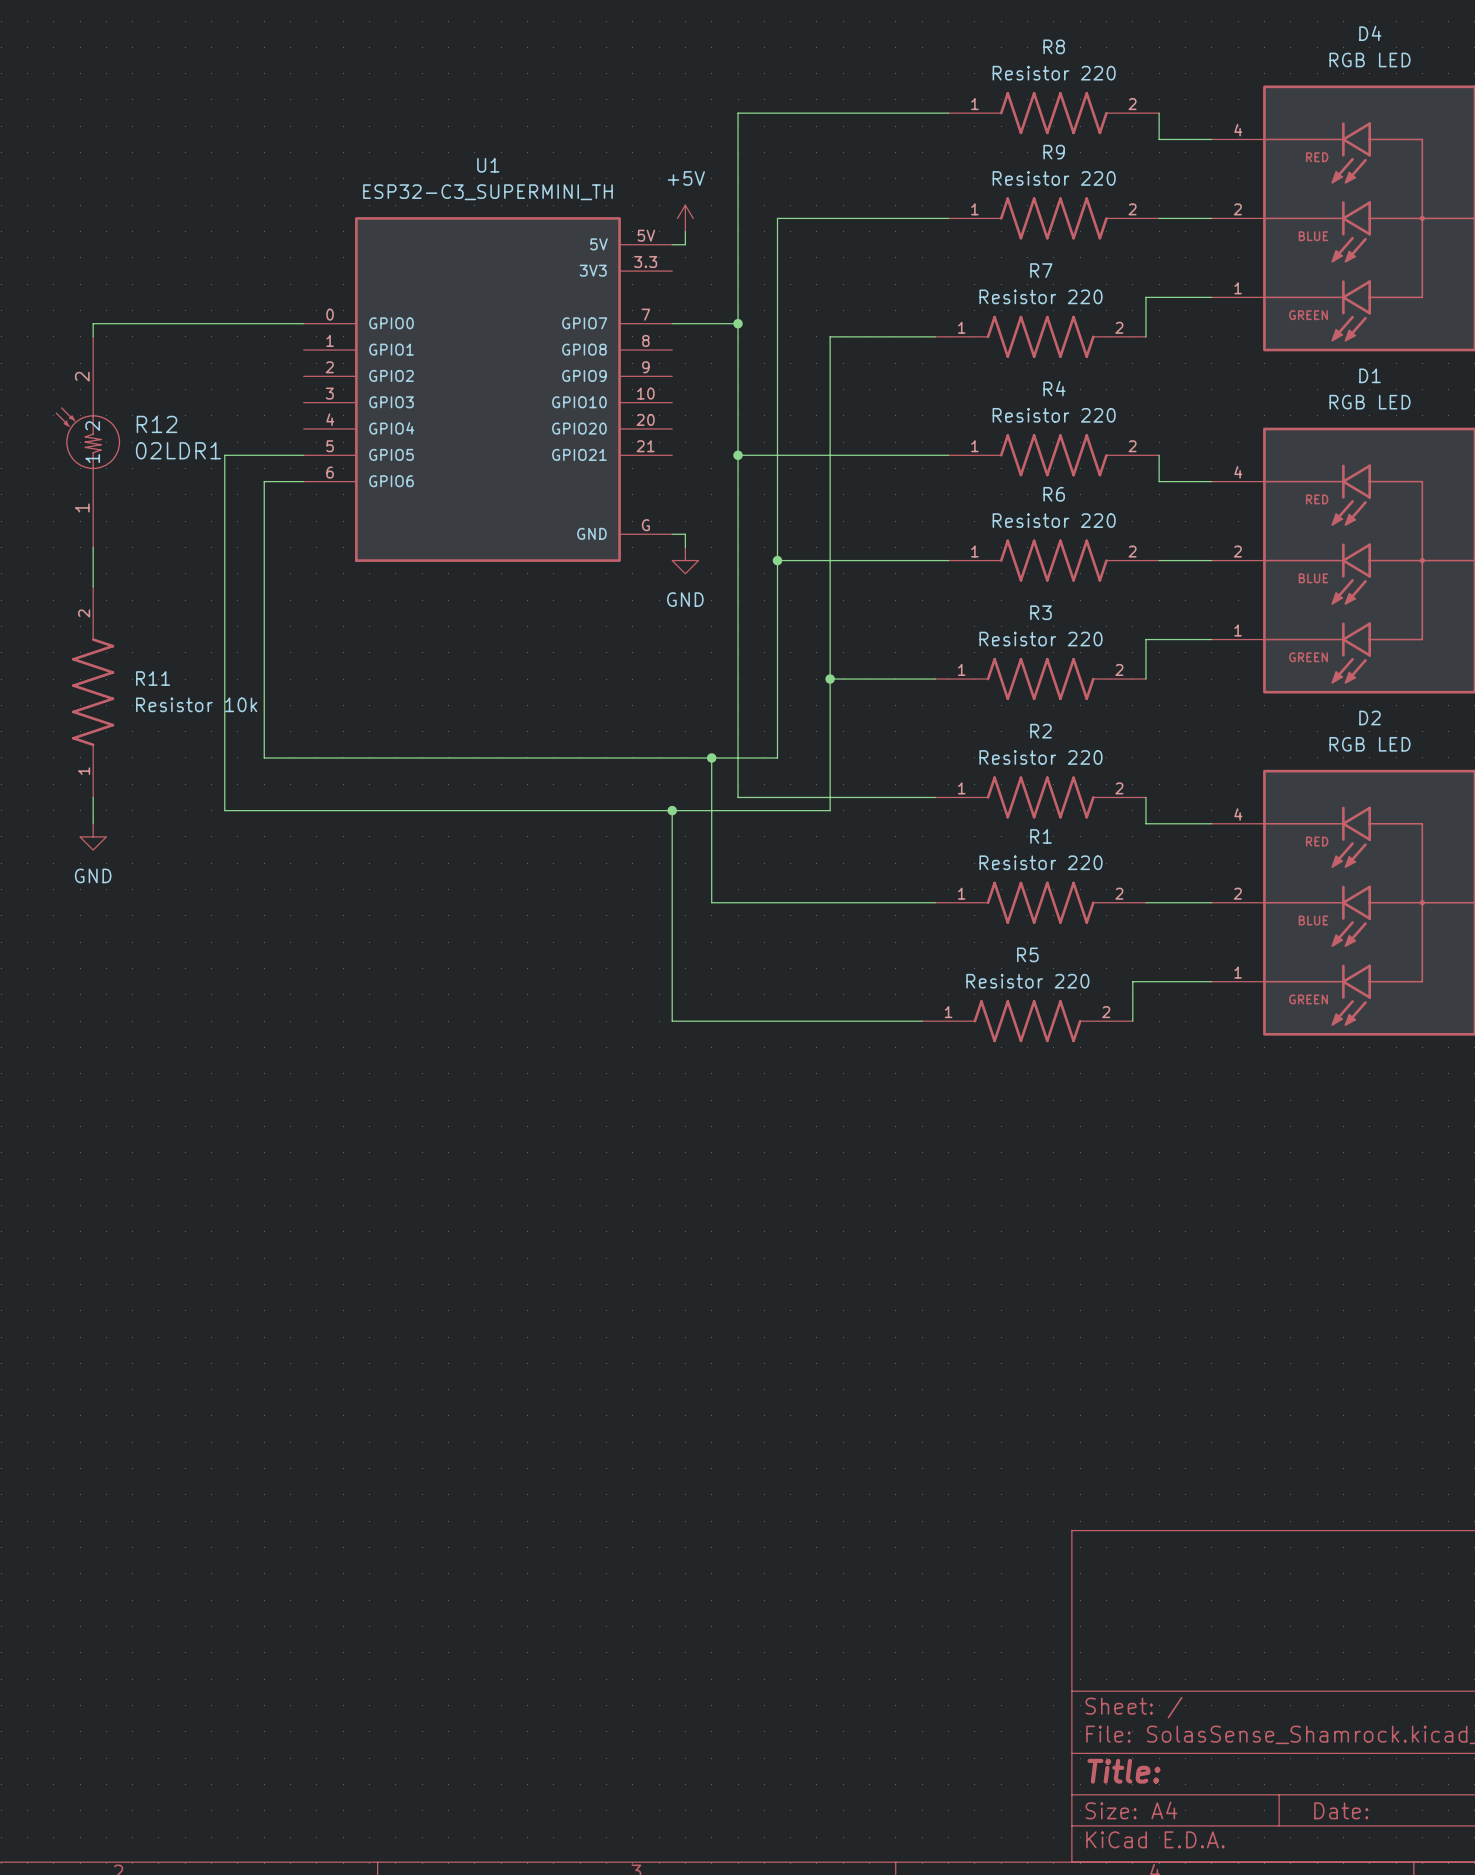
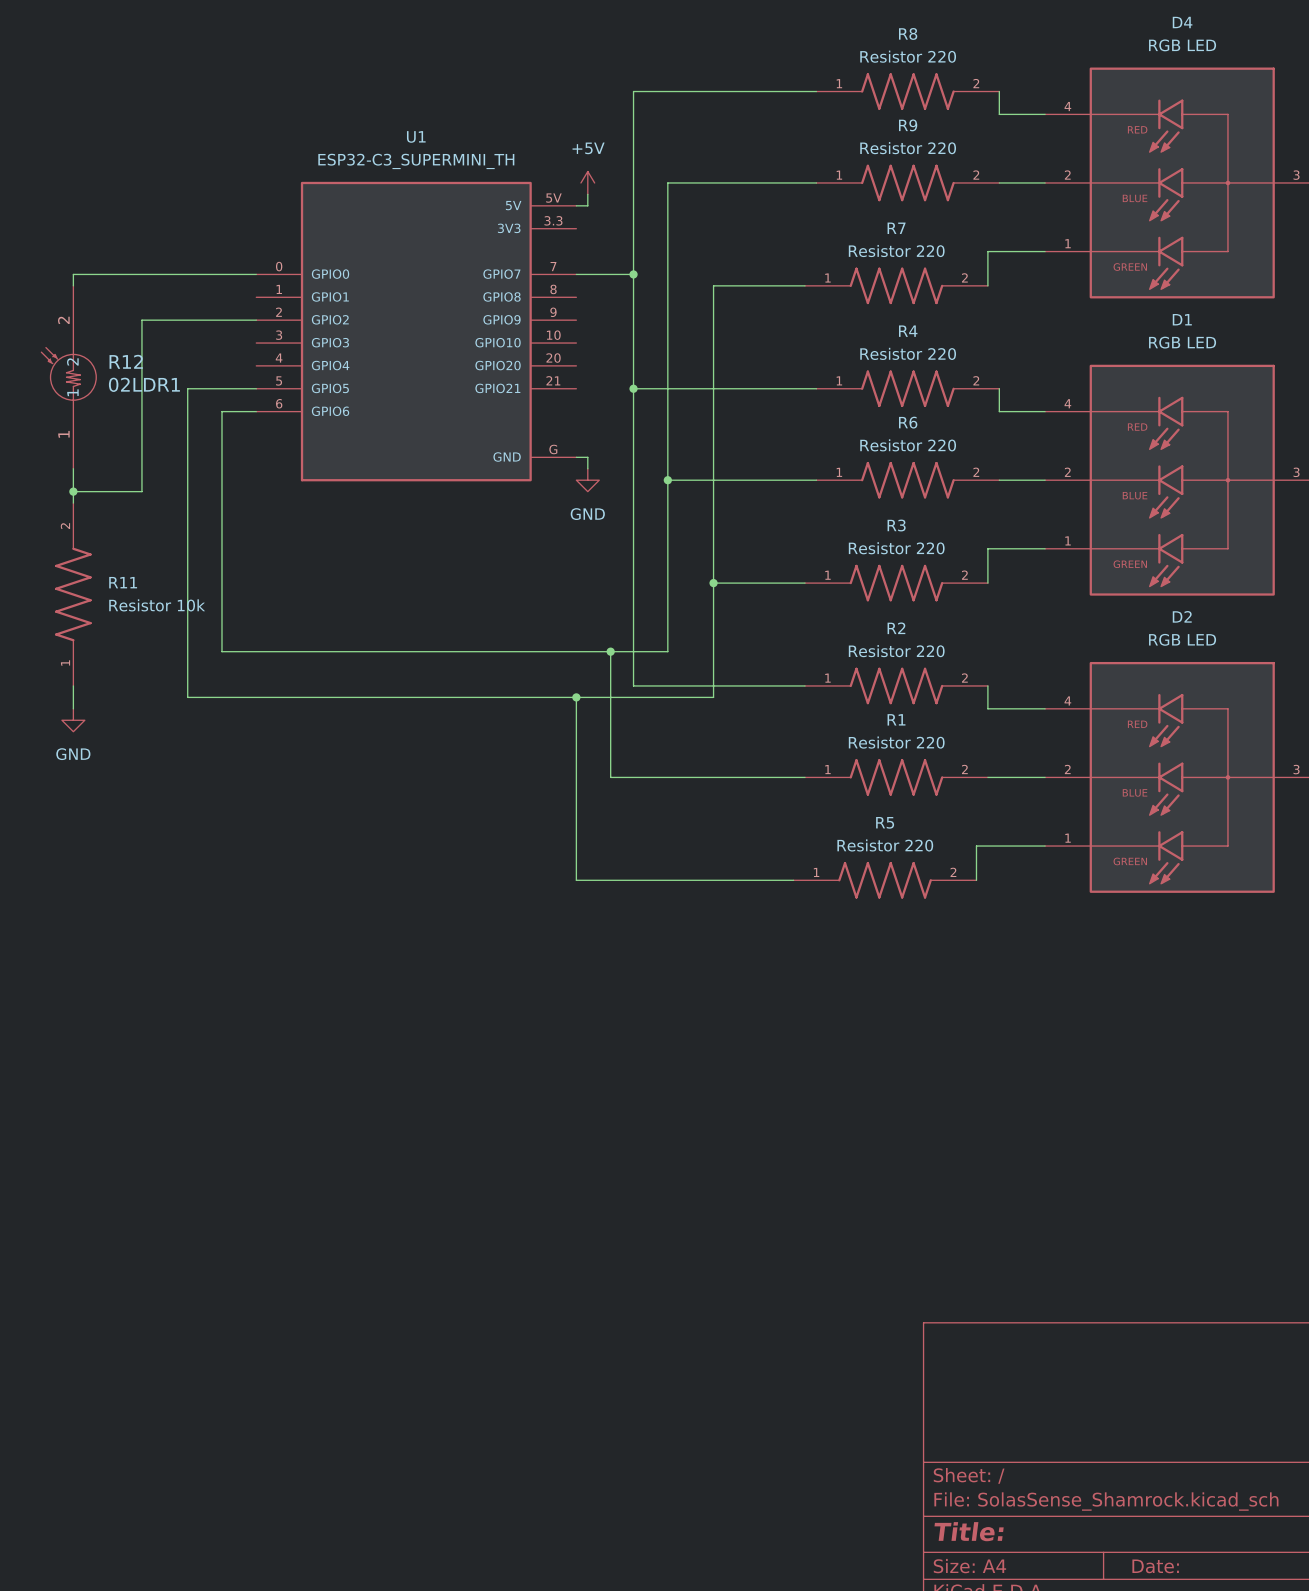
wire: none -> (256, 320) (141, 320) (141, 491) (73, 491)
junction: none -> (73, 491)

